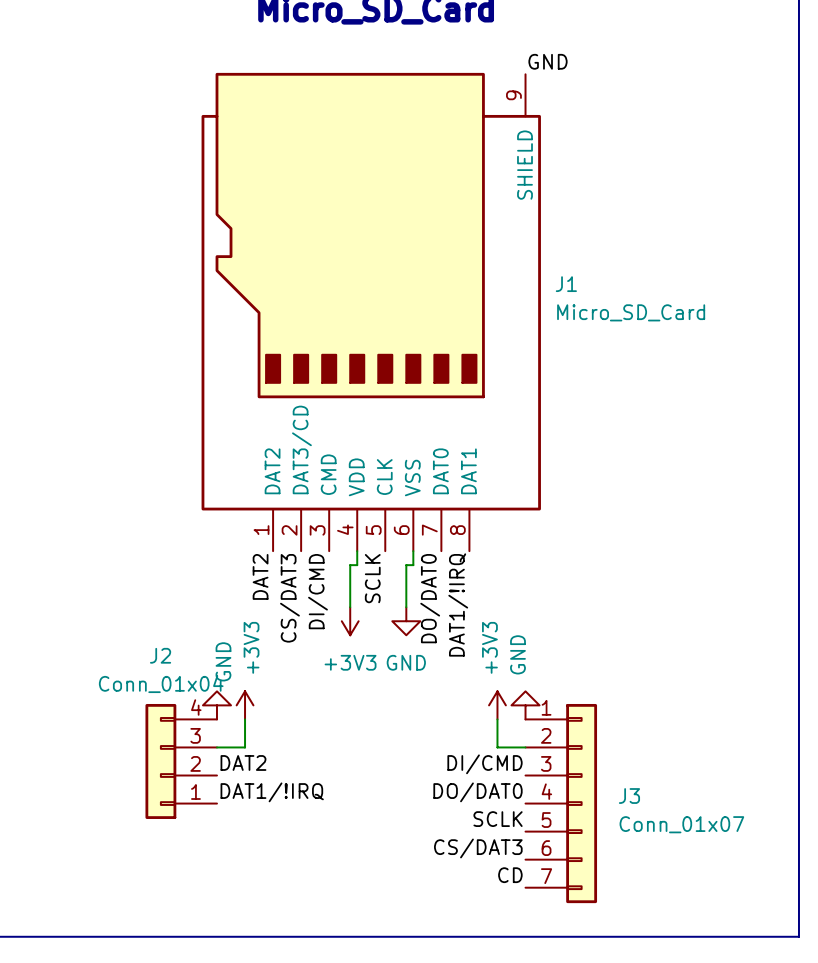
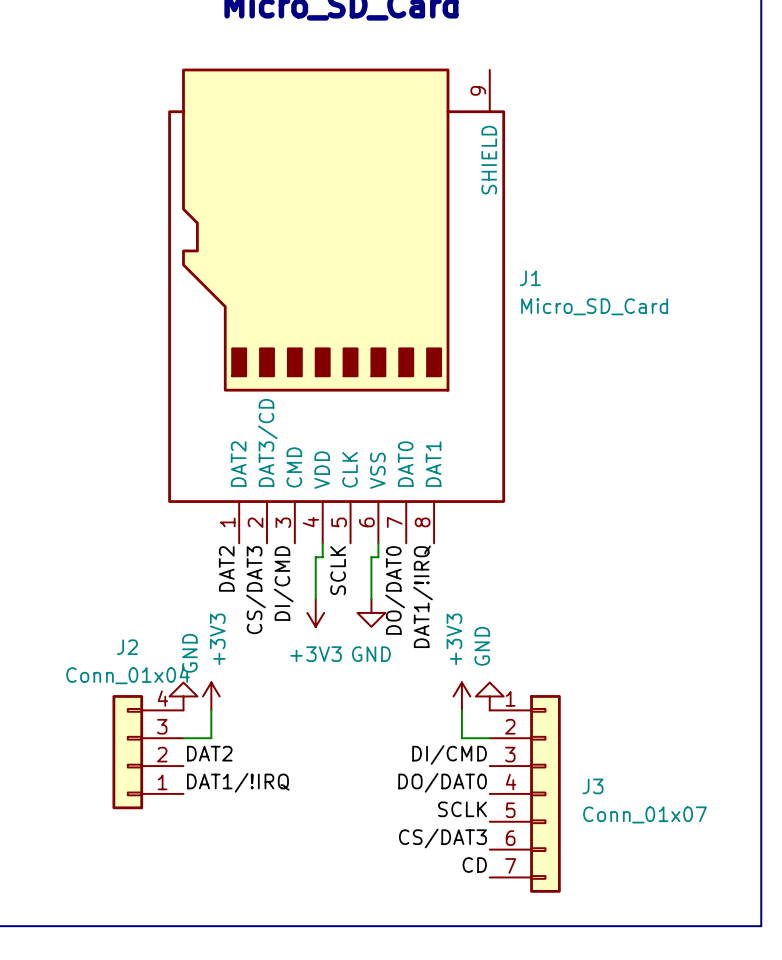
label: GND (547, 61) -> none

